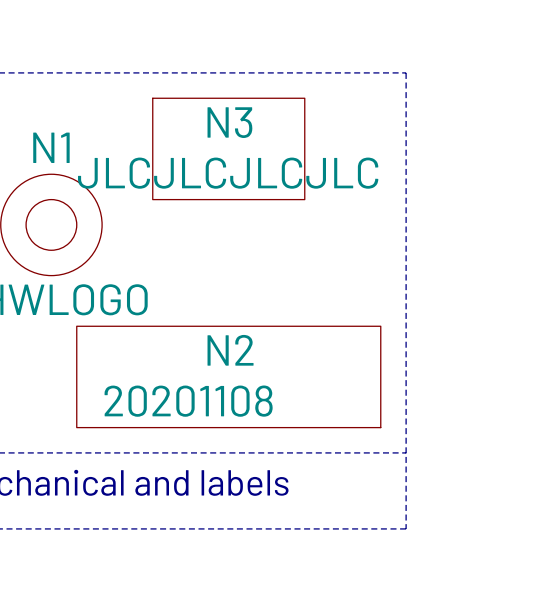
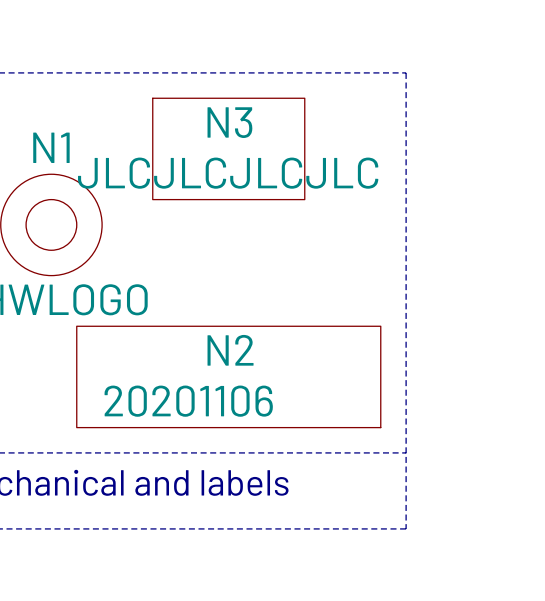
N2 value: 20201108 (188, 401) -> 20201106 (188, 401)

